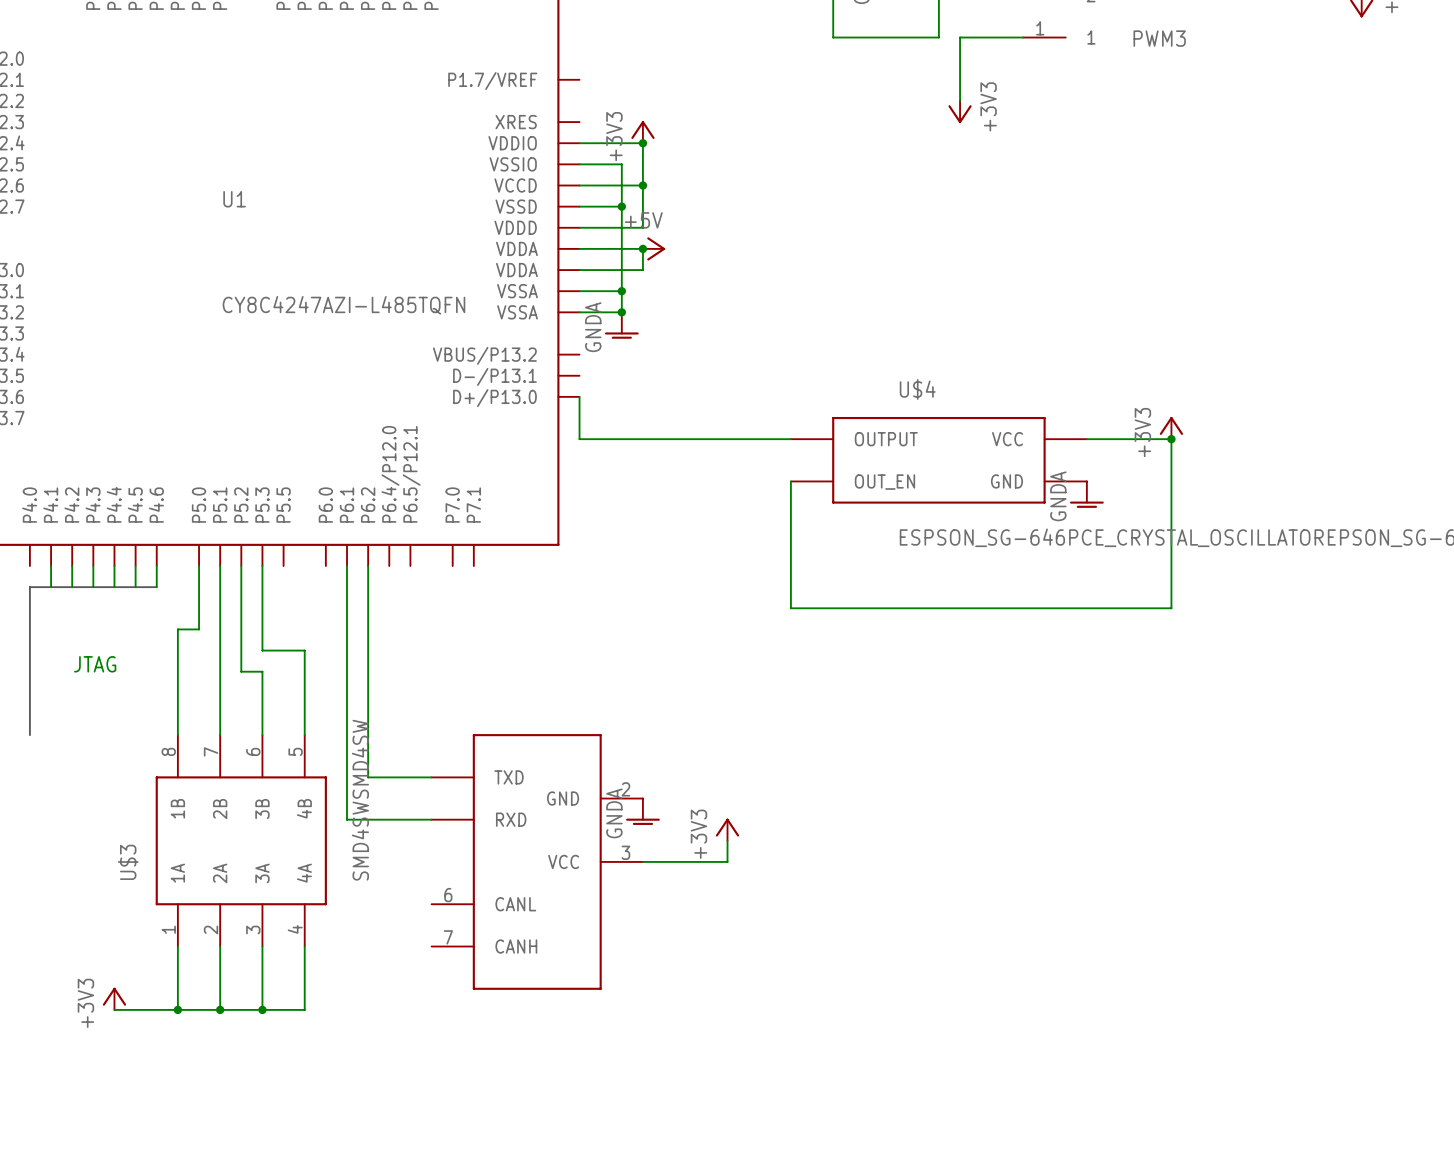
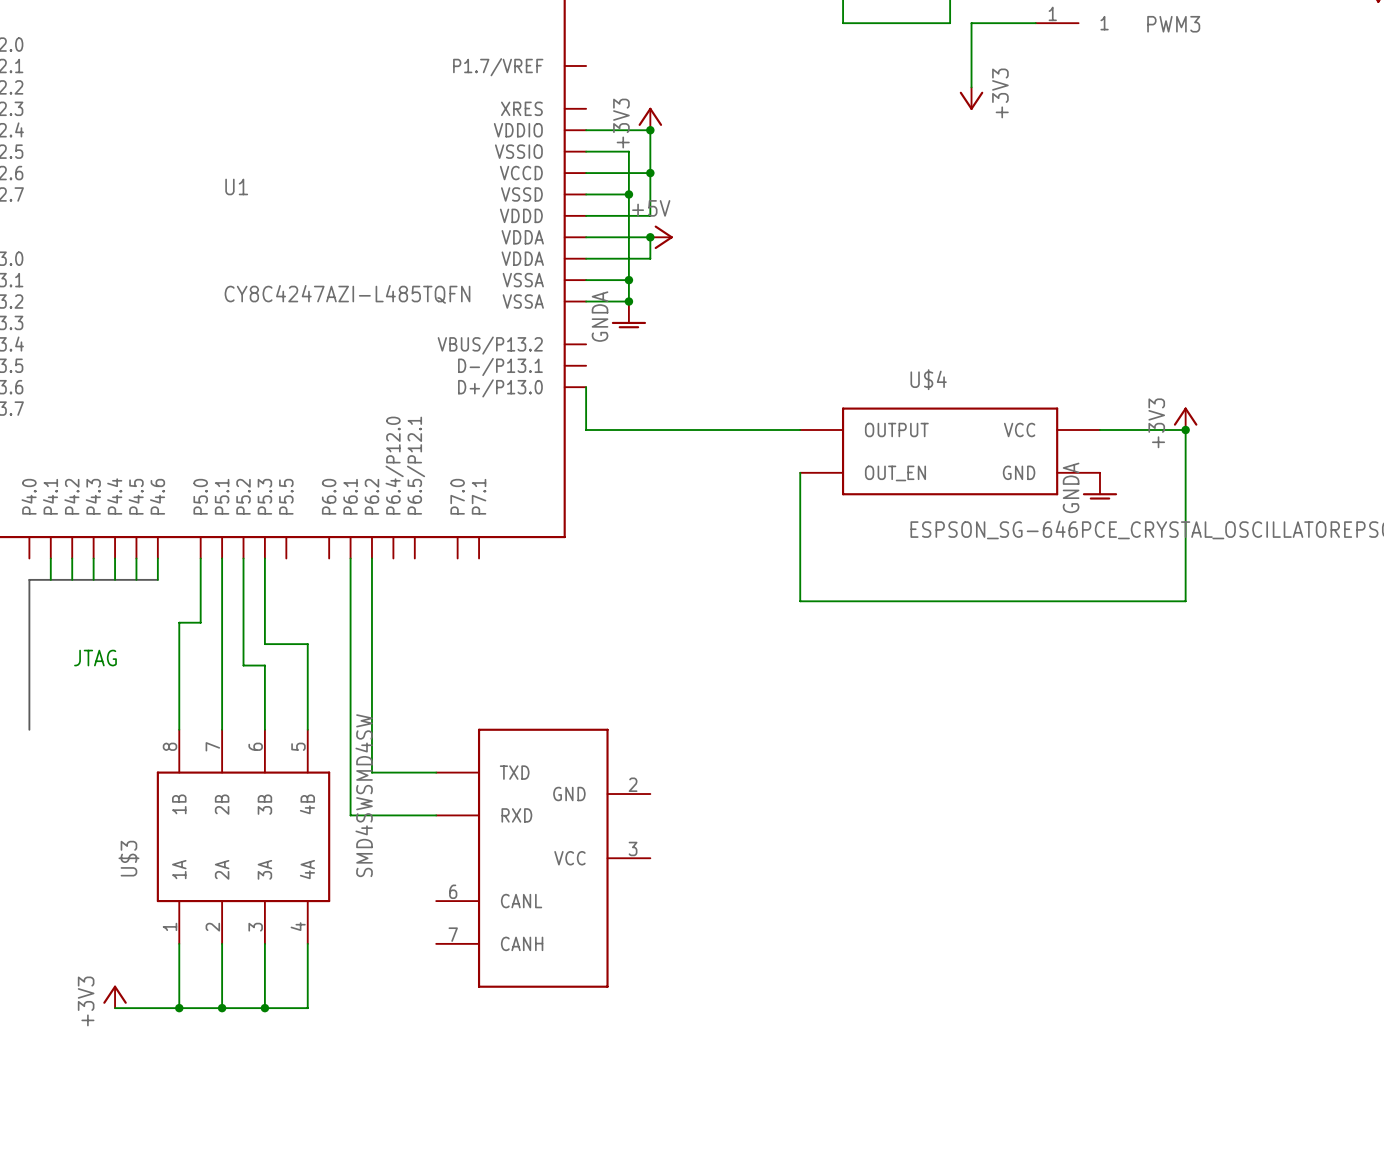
power symbol: GNDA (642, 811) -> none
power symbol: +3V3 (727, 829) -> none
wire: (727, 840) (727, 861) (642, 861) -> none

